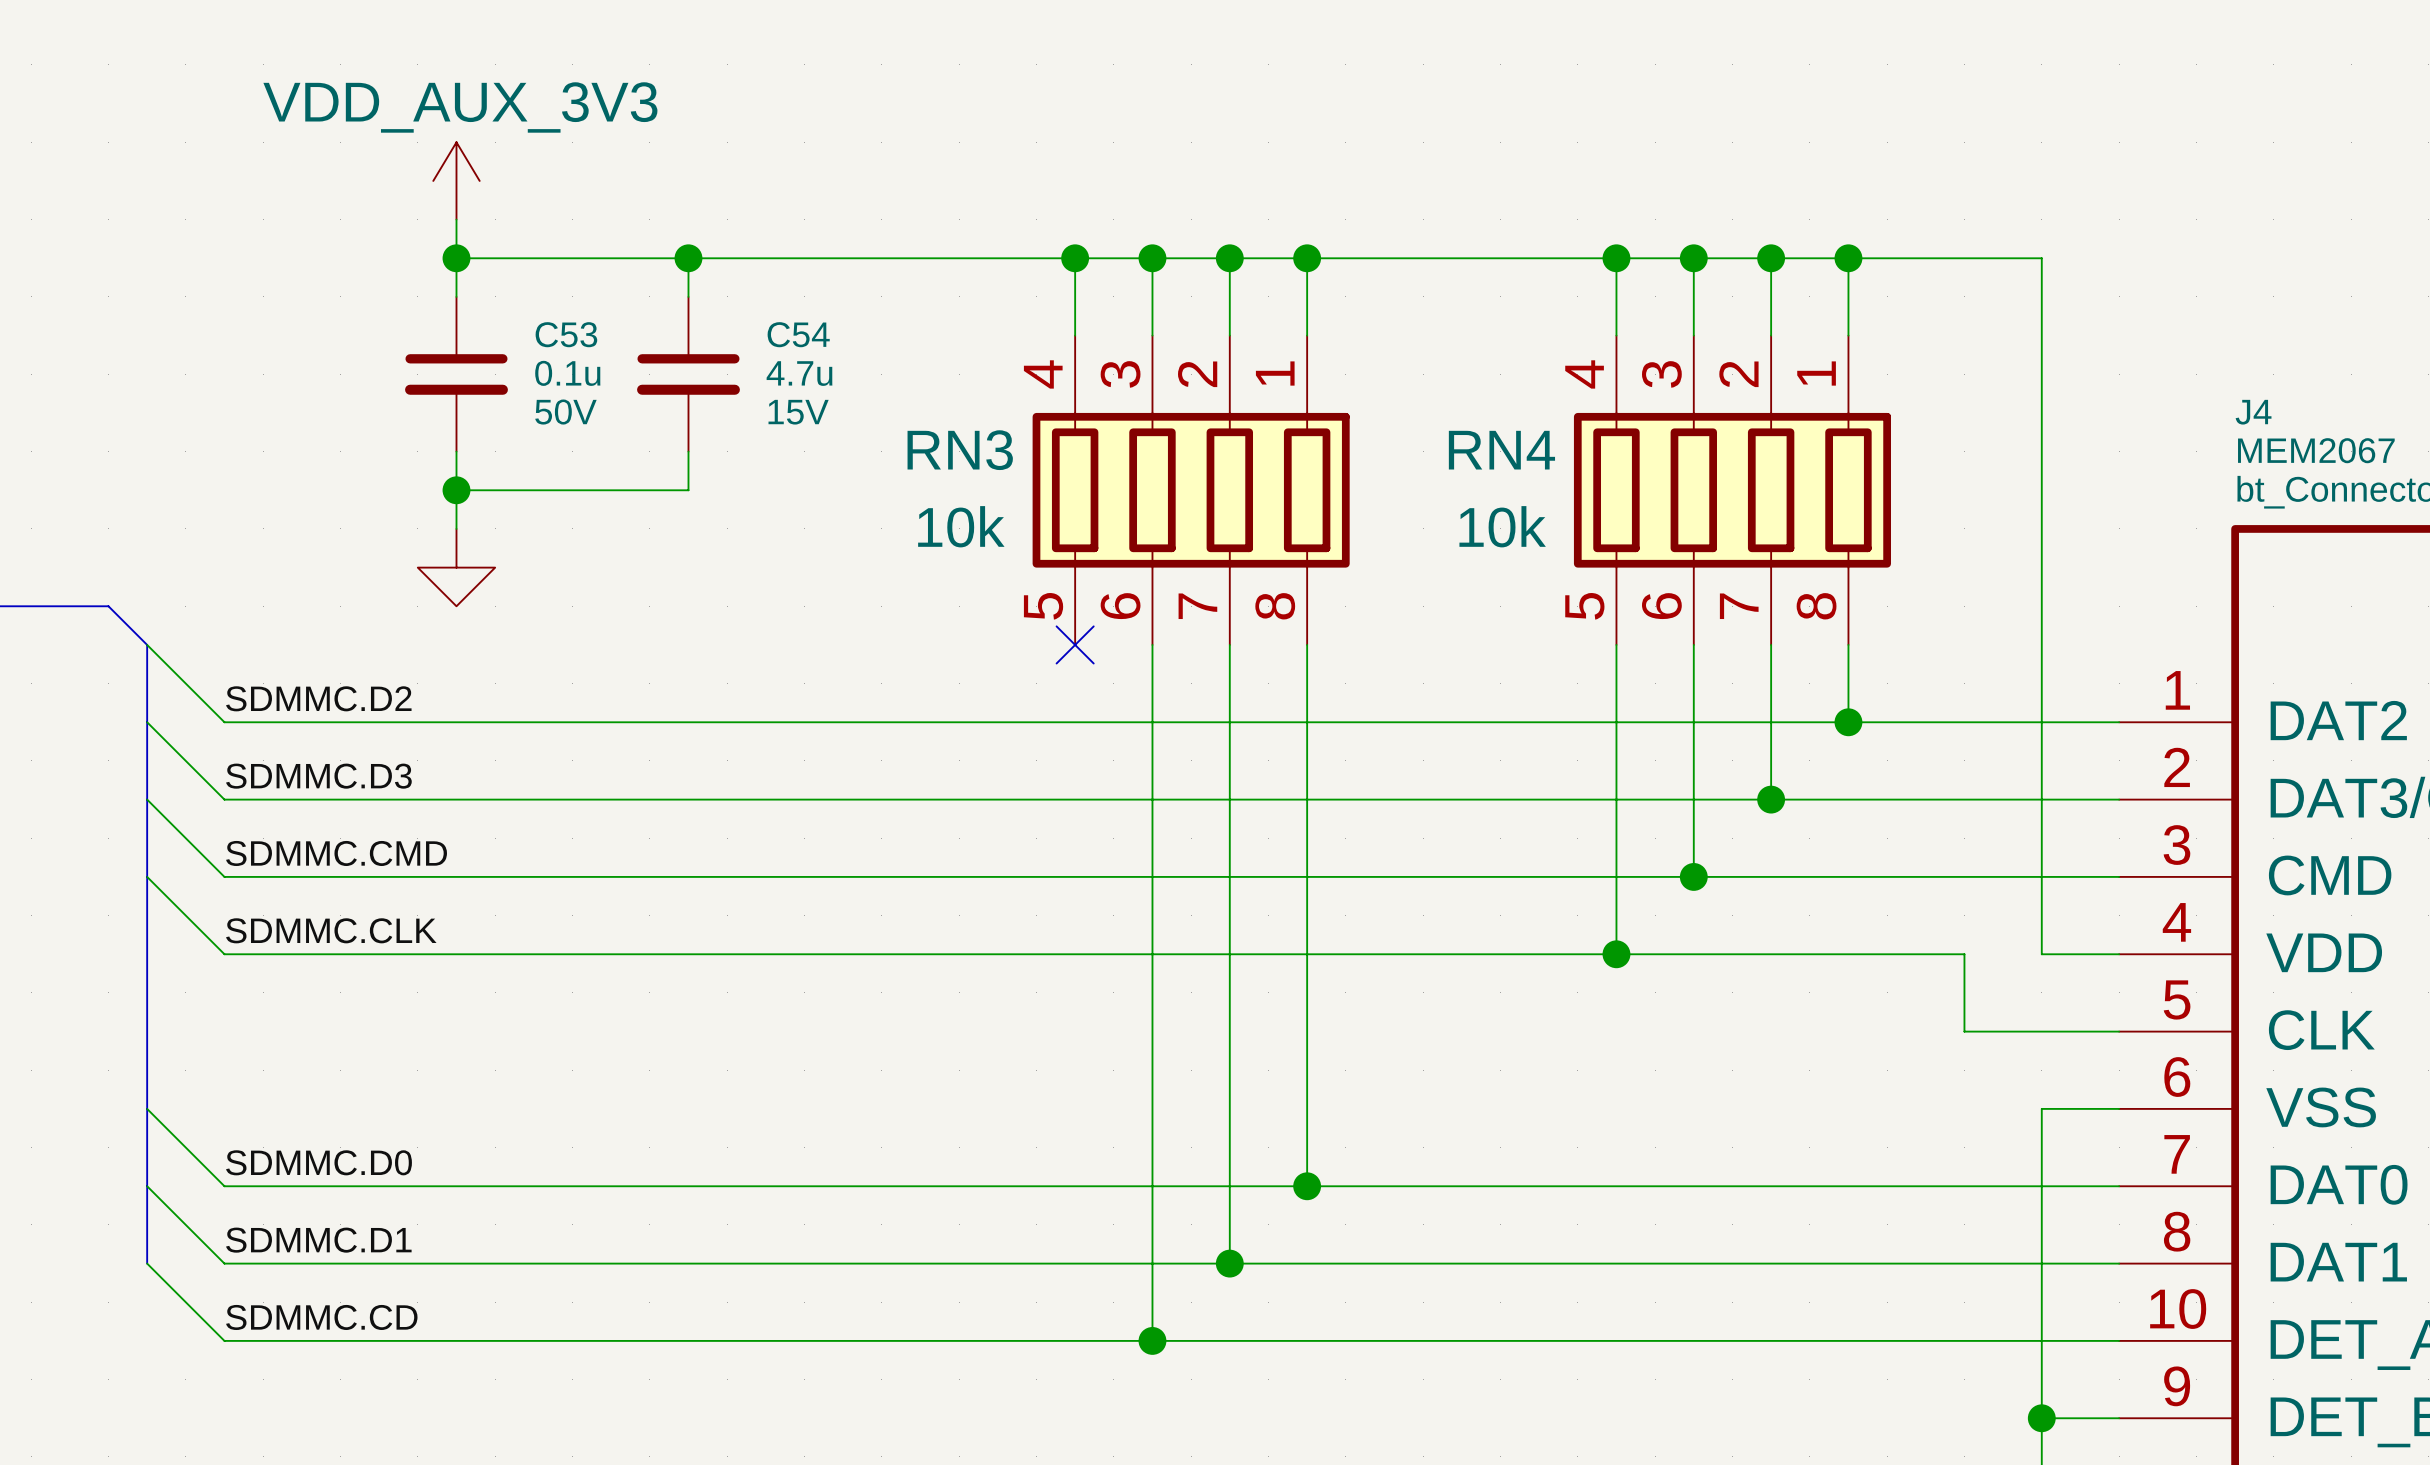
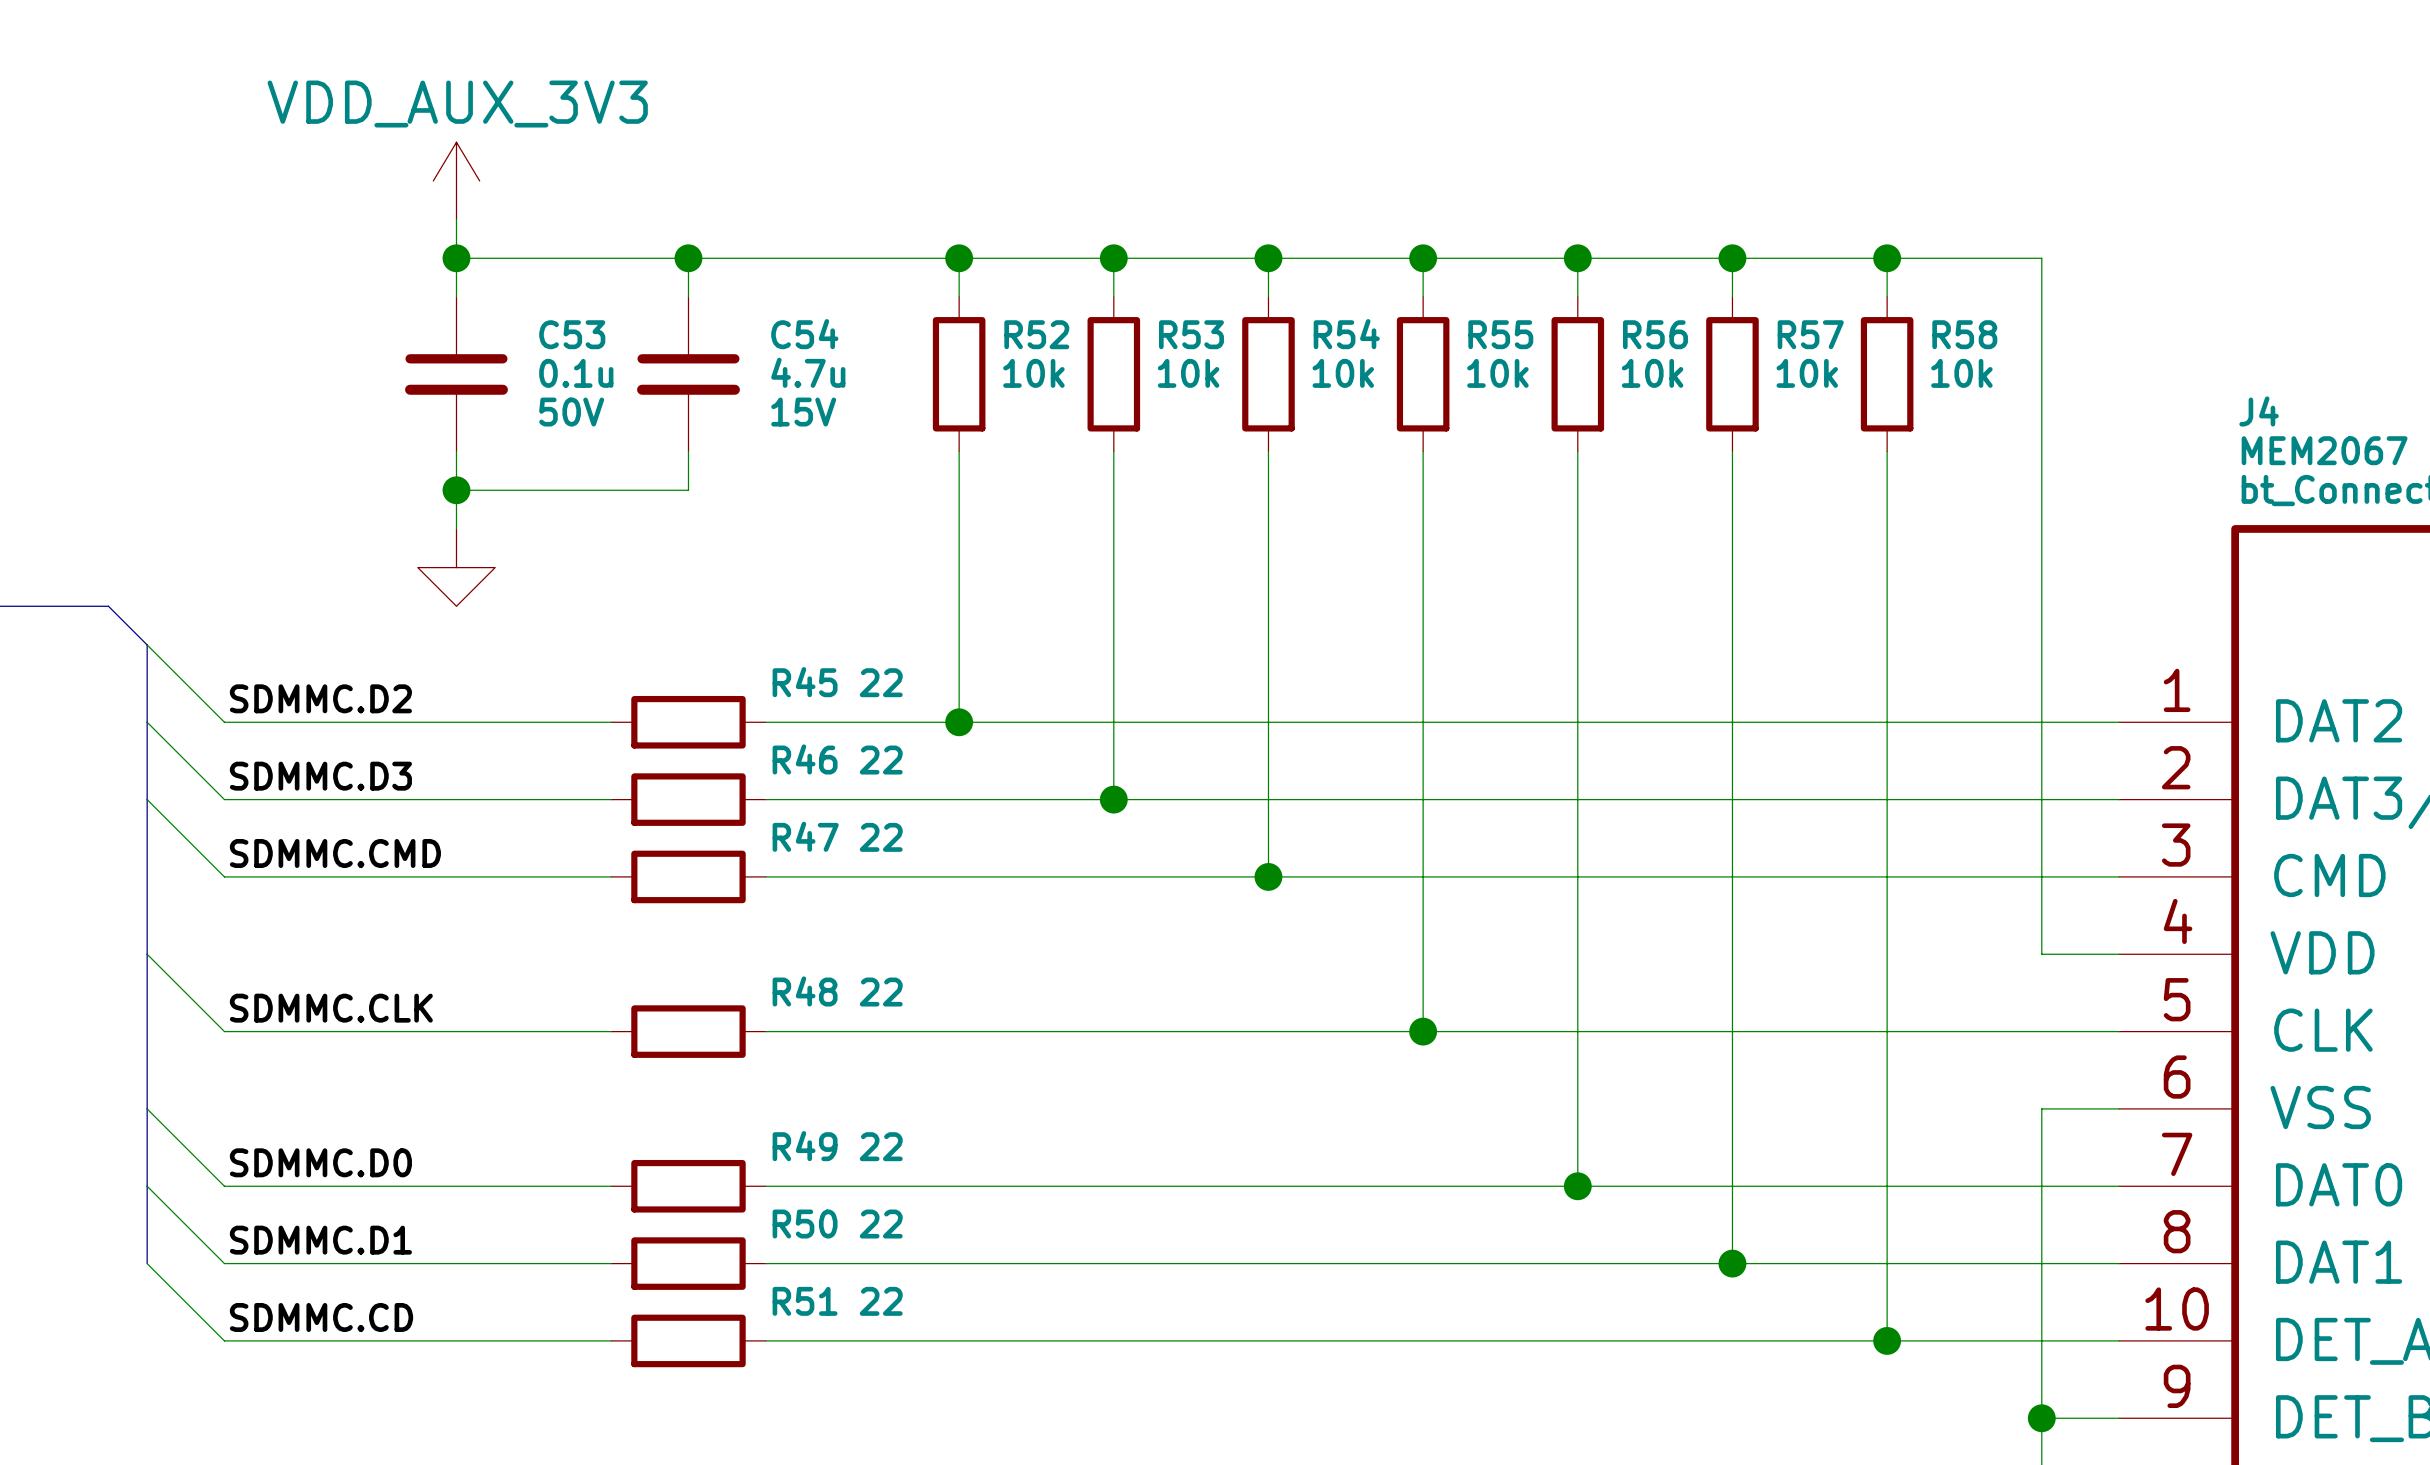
wire: none -> (959, 258) (959, 296)
junction: none -> (959, 258)
wire: (1075, 258) (1075, 335) -> none
junction: (1075, 258) -> none
wire: none -> (1113, 258) (1113, 296)
junction: none -> (1113, 258)
wire: (1152, 258) (1152, 335) -> none
junction: (1152, 258) -> none
wire: (1229, 258) (1229, 335) -> none
junction: (1229, 258) -> none
wire: none -> (1268, 258) (1268, 296)
junction: none -> (1268, 258)
wire: (1307, 258) (1307, 335) -> none
junction: (1307, 258) -> none
wire: none -> (1423, 258) (1423, 296)
junction: none -> (1423, 258)
wire: none -> (1577, 258) (1577, 296)
wire: (1616, 258) (1616, 335) -> none
junction position: (1616, 258) -> (1577, 258)
wire: (1693, 258) (1693, 335) -> none
junction: (1693, 258) -> none
wire: none -> (1732, 258) (1732, 296)
junction: none -> (1732, 258)
wire: (1771, 258) (1771, 335) -> none
junction: (1771, 258) -> none
wire: (1848, 258) (1848, 335) -> none
junction position: (1848, 258) -> (1887, 258)
wire: none -> (1887, 258) (1887, 296)
R52: none -> 10k (959, 374)
R53: none -> 10k (1113, 374)
R54: none -> 10k (1268, 374)
R55: none -> 10k (1423, 374)
R56: none -> 10k (1577, 374)
R57: none -> 10k (1732, 374)
R58: none -> 10k (1887, 374)
wire: none -> (959, 451) (959, 722)
wire: none -> (1113, 451) (1113, 799)
wire: none -> (1268, 451) (1268, 876)
wire: none -> (1423, 451) (1423, 1031)
wire: none -> (1577, 451) (1577, 1186)
wire: none -> (1732, 451) (1732, 1263)
wire: none -> (1887, 451) (1887, 1340)
RN3: 10k (1191, 490) -> none
RN4: 10k (1732, 490) -> none
no-connect mark: (1075, 644) -> none
wire: (1152, 644) (1152, 1340) -> none
wire: (1229, 644) (1229, 1263) -> none
wire: (1307, 644) (1307, 1186) -> none
wire: (1616, 644) (1616, 954) -> none
wire: (1693, 644) (1693, 876) -> none
wire: (1771, 644) (1771, 799) -> none
wire: (1848, 644) (1848, 722) -> none
wire: (611, 722) (765, 722) -> none
R45: none -> 22 (688, 722)
junction: none -> (959, 722)
junction: (1848, 722) -> none
wire: (611, 799) (765, 799) -> none
R46: none -> 22 (688, 799)
junction: none -> (1113, 799)
junction: (1771, 799) -> none
wire: (147, 876) (224, 954) (1964, 954) (1964, 1031) -> (765, 1031) (1964, 1031)
wire: (611, 876) (765, 876) -> none
R47: none -> 22 (688, 876)
junction: none -> (1268, 876)
junction: (1693, 876) -> none
label position: SDMMC.CLK (331, 930) -> SDMMC.CLK (331, 1008)
wire: none -> (147, 954) (224, 1031) (611, 1031)
junction: (1616, 954) -> none
R48: none -> 22 (688, 1031)
junction: none -> (1423, 1031)
wire: (611, 1186) (765, 1186) -> none
R49: none -> 22 (688, 1186)
junction: (1307, 1186) -> none
junction: none -> (1577, 1186)
wire: (611, 1263) (765, 1263) -> none
R50: none -> 22 (688, 1263)
junction: (1229, 1263) -> none
junction: none -> (1732, 1263)
wire: (611, 1340) (765, 1340) -> none
R51: none -> 22 (688, 1340)
junction: (1152, 1340) -> none
junction: none -> (1887, 1340)

